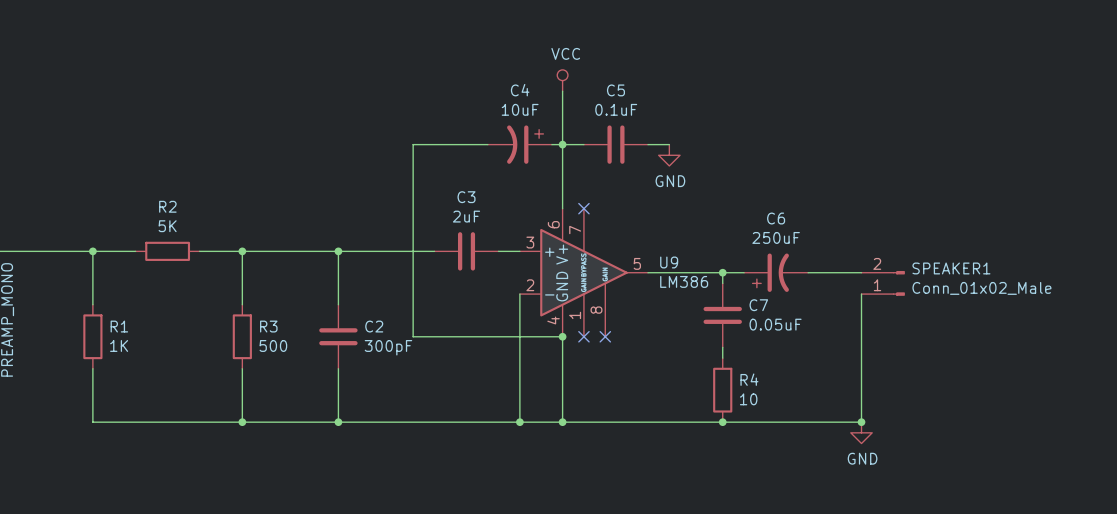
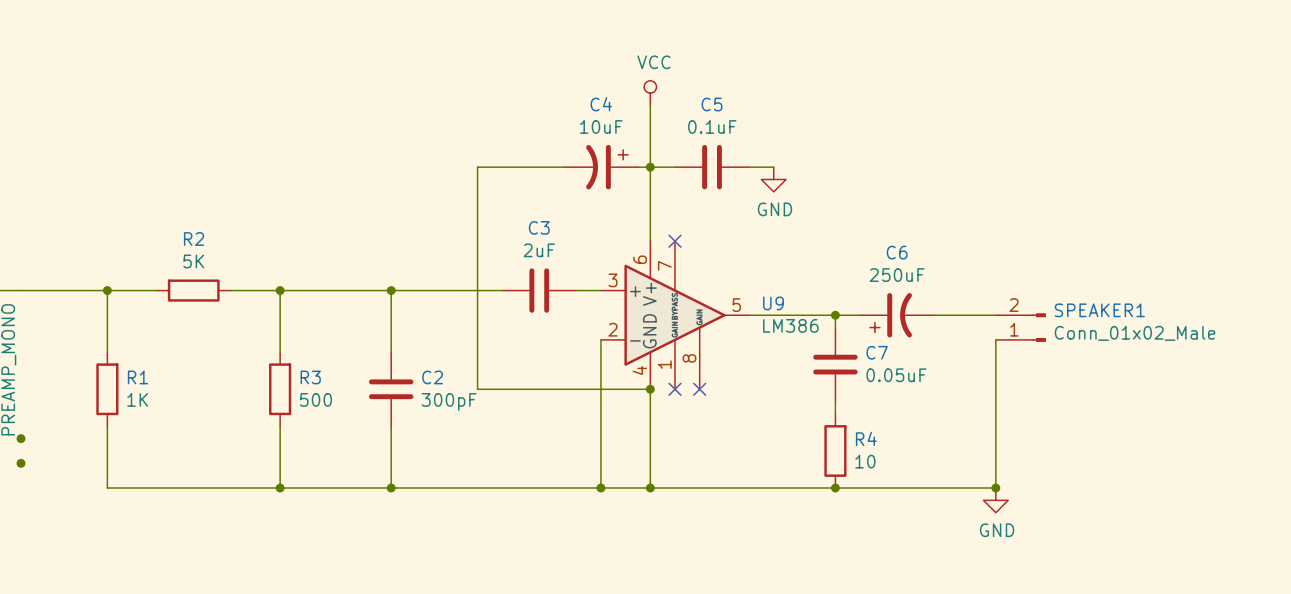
junction: none -> (20, 438)
junction: none -> (20, 463)

